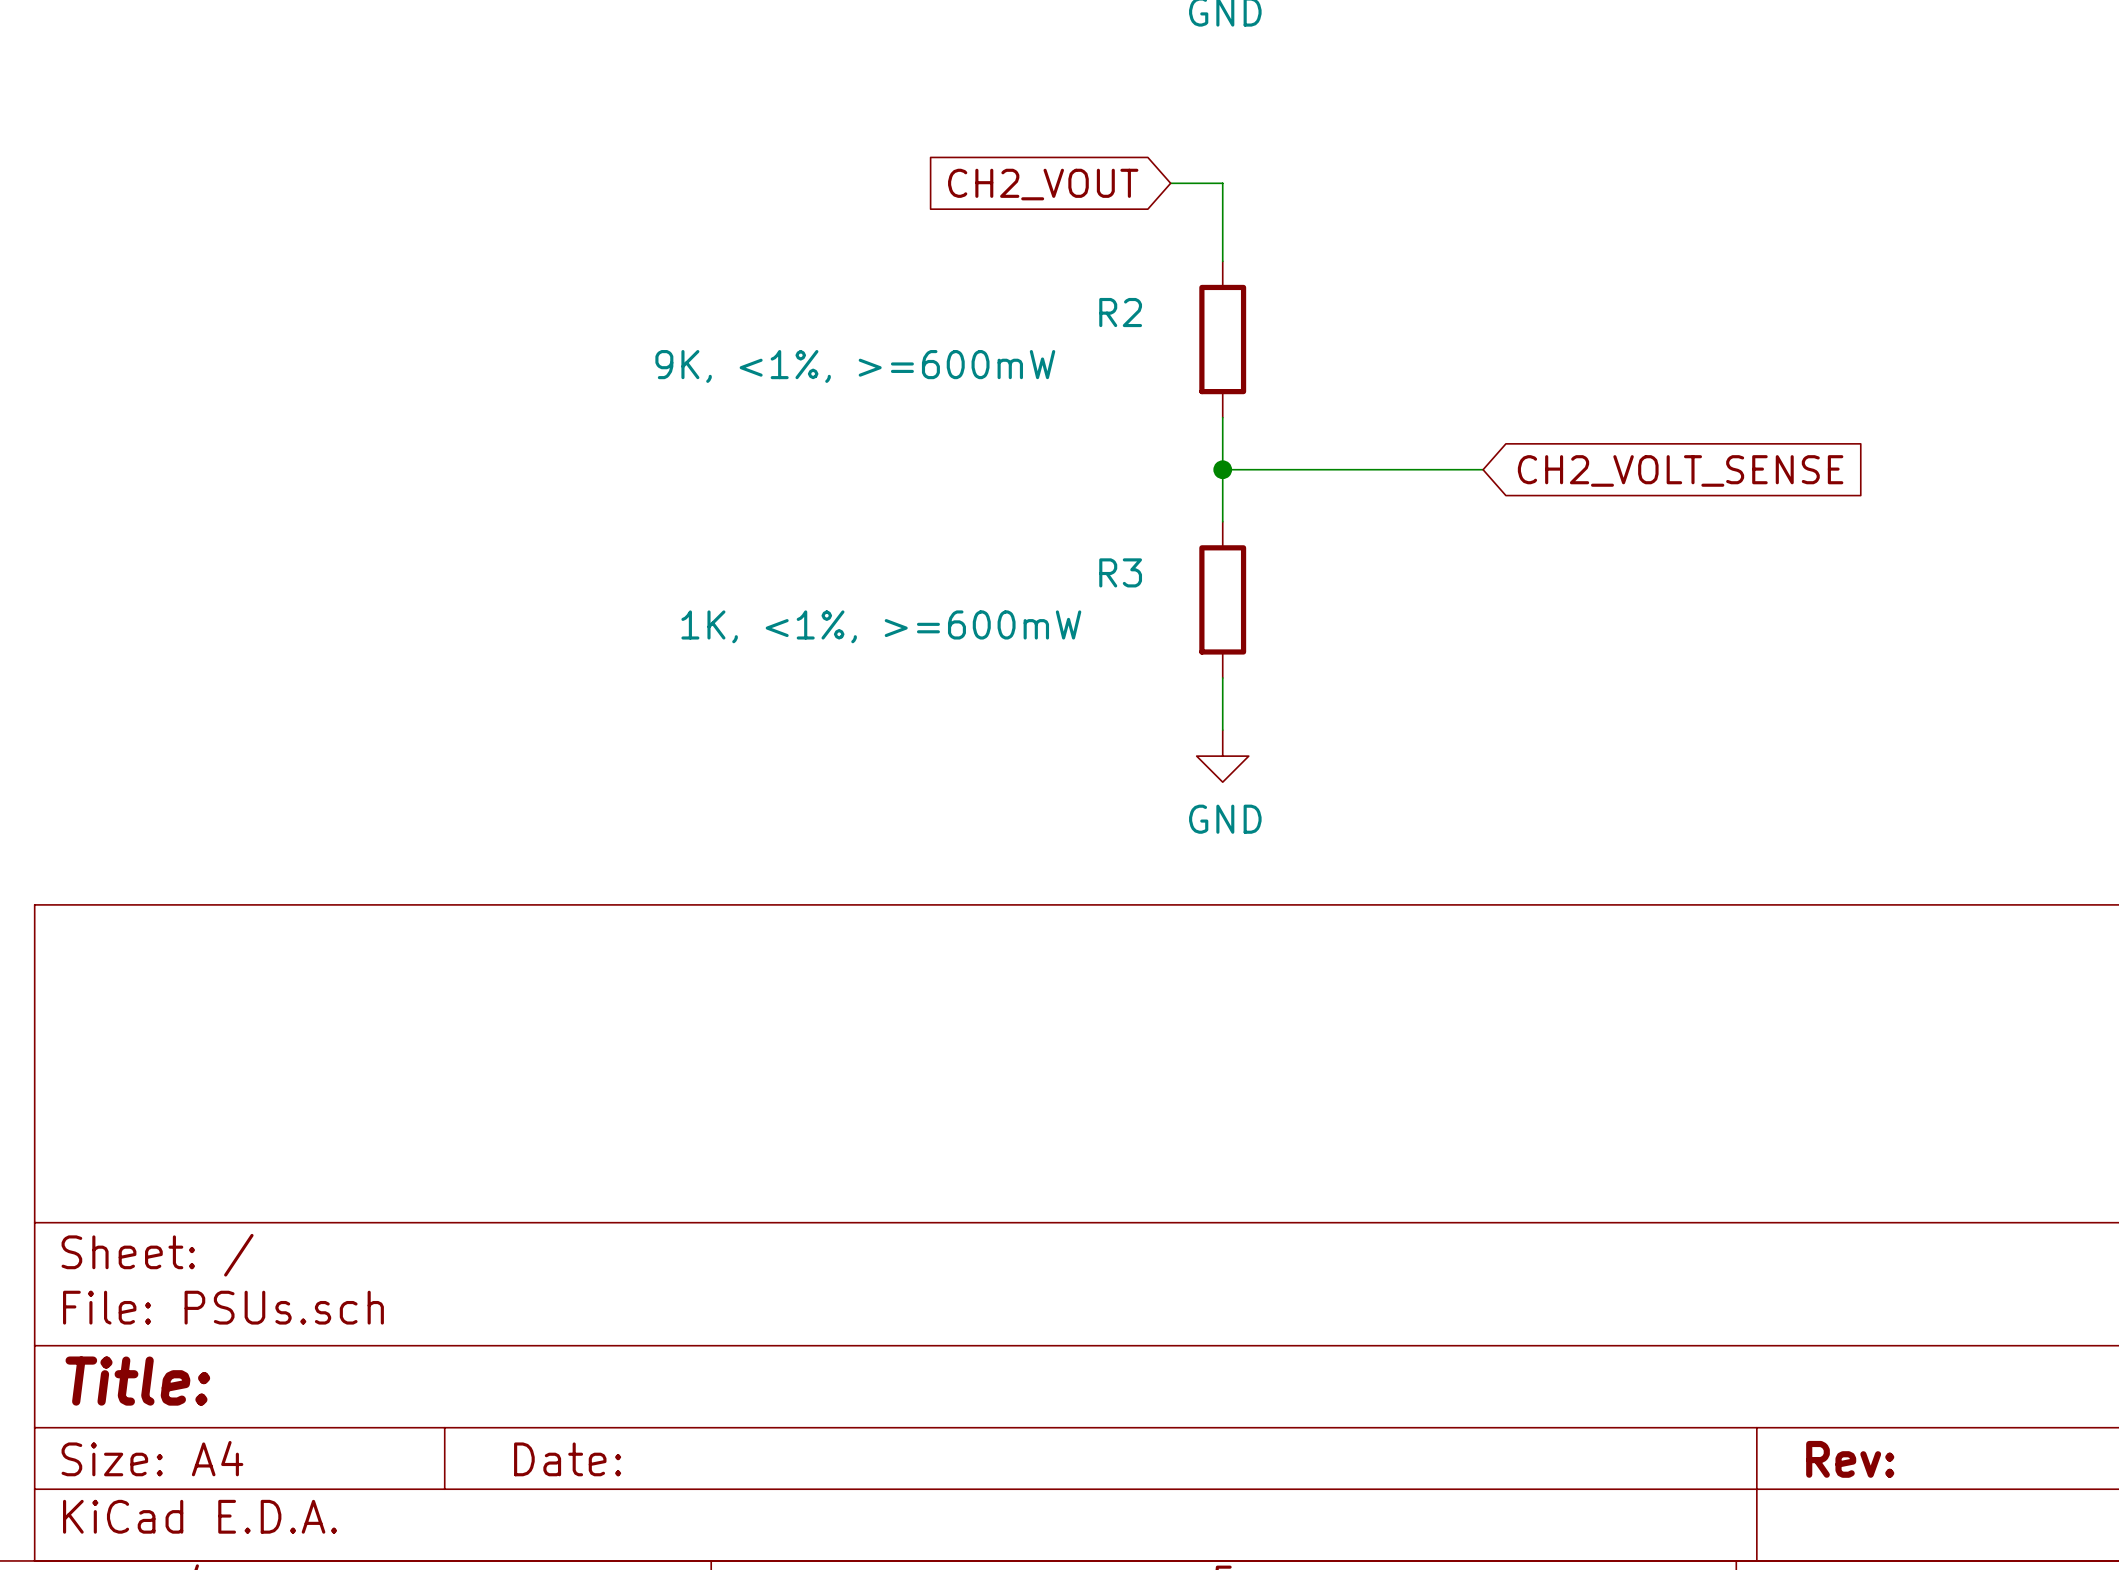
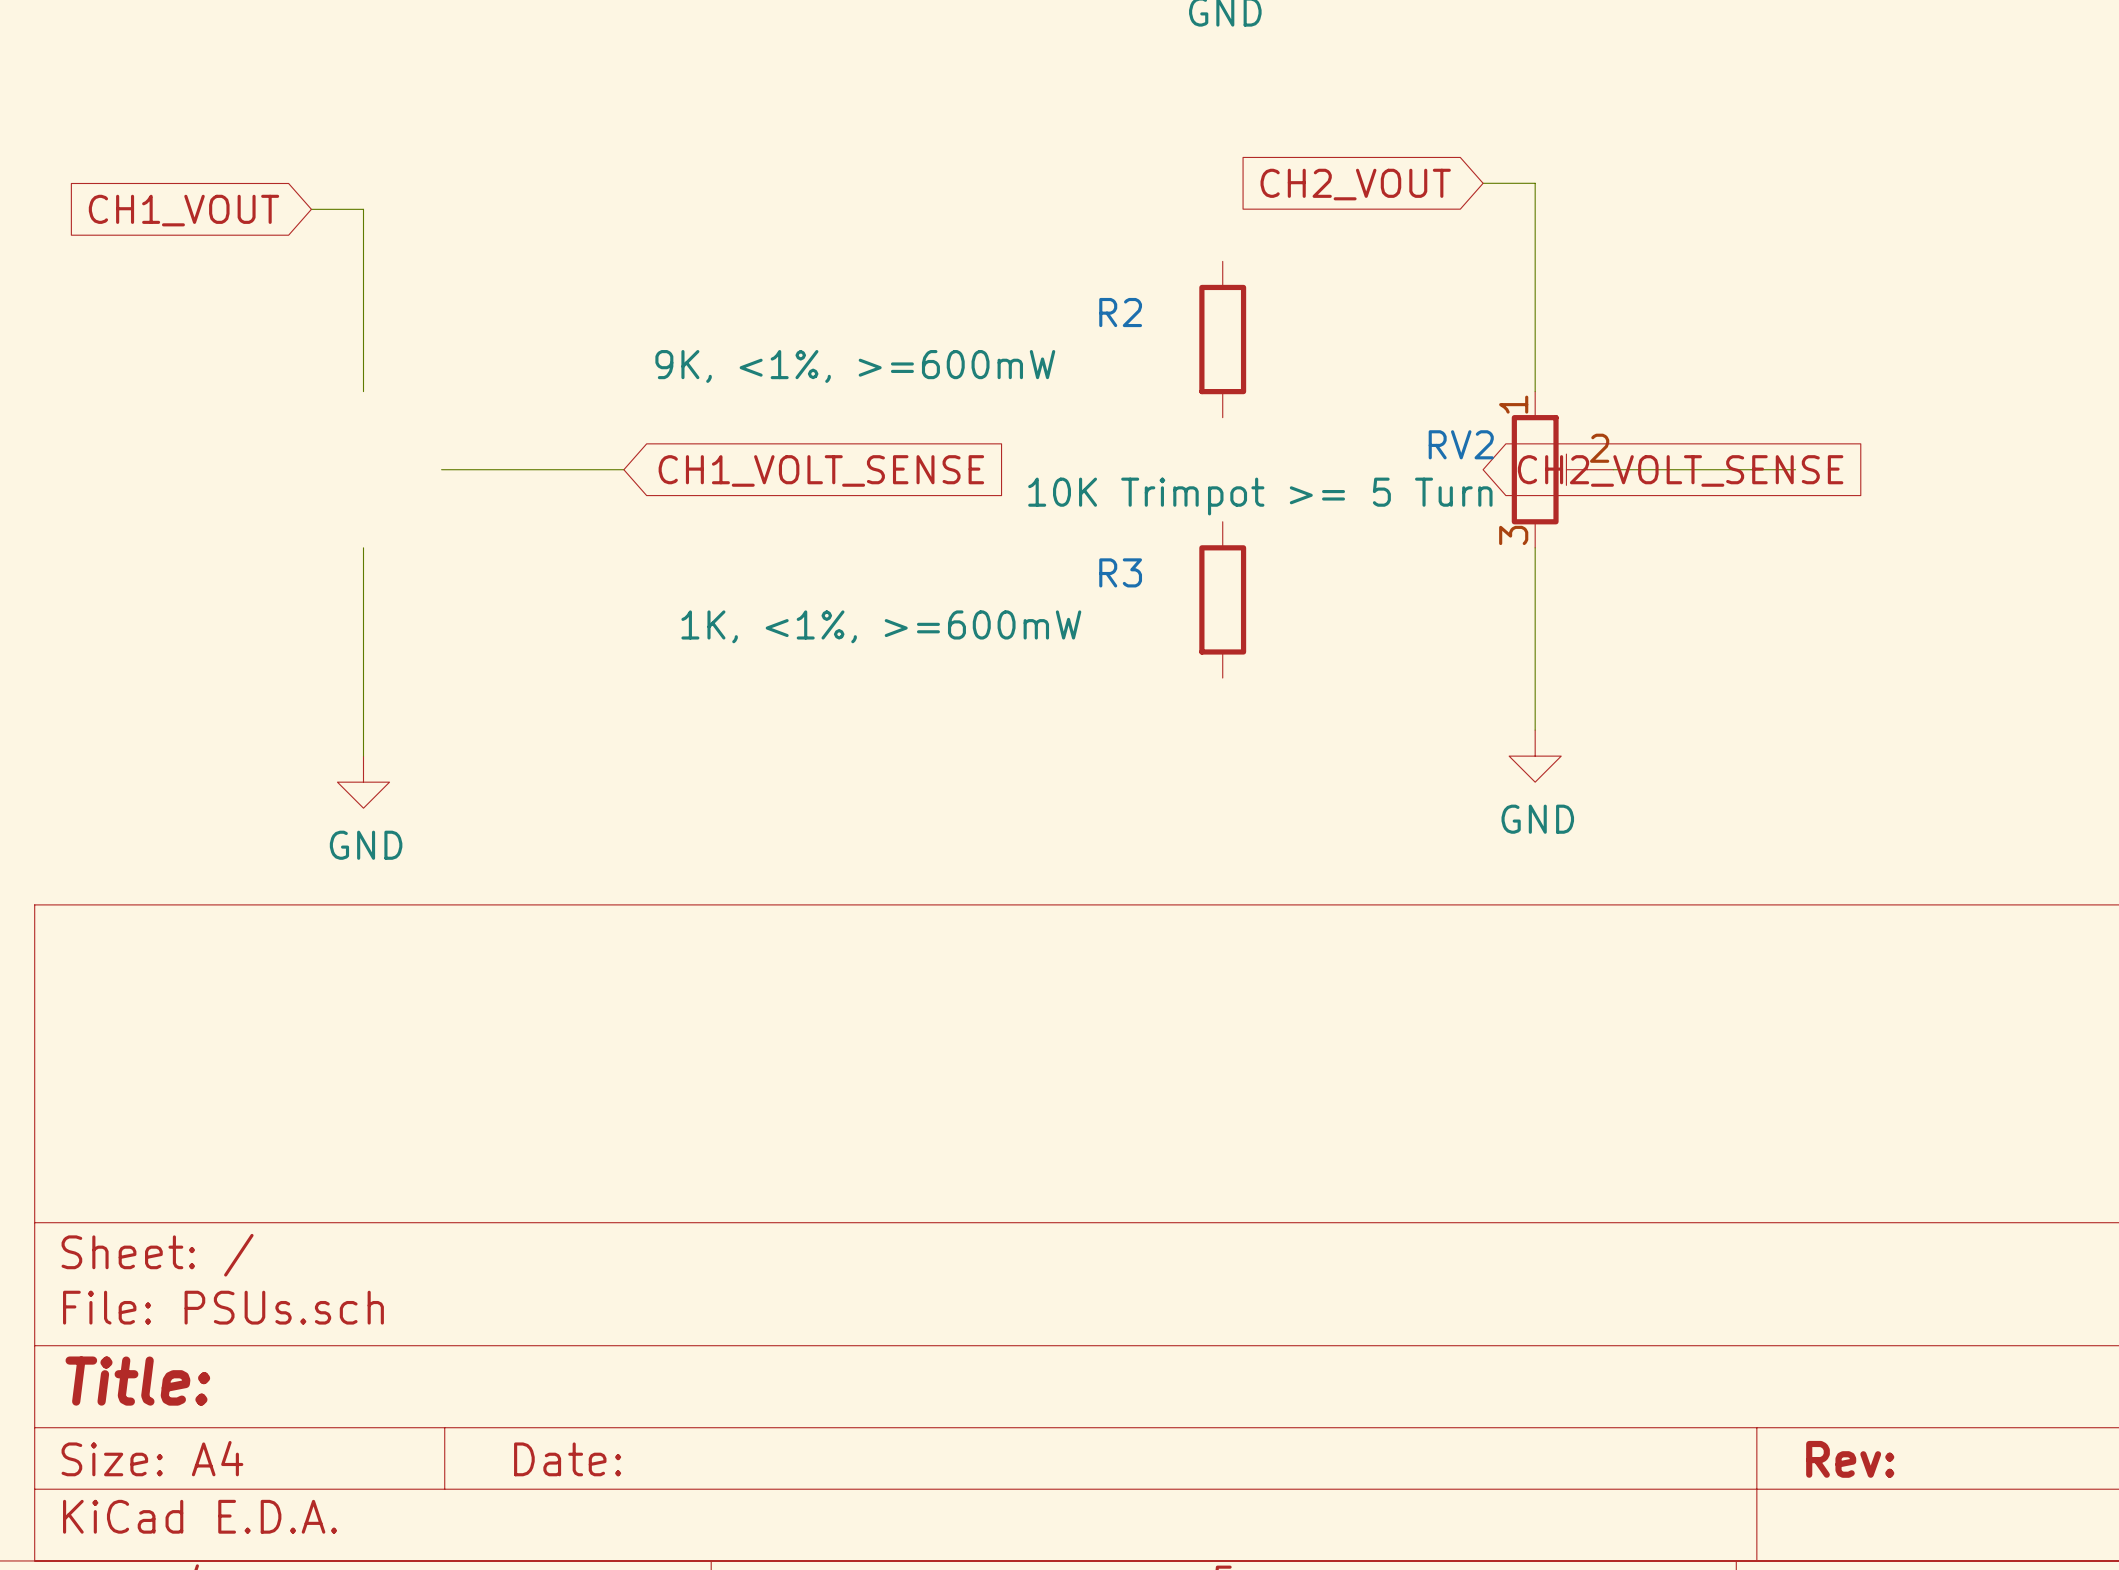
wire: (1170, 183) (1222, 183) (1222, 261) -> none
wire: none -> (1483, 183) (1535, 183) (1535, 391)
global label position: CH2_VOUT (1043, 184) -> CH2_VOUT (1355, 184)
wire: none -> (311, 209) (363, 209) (363, 391)
global label: none -> CH1_VOUT (183, 210)
wire: (1222, 417) (1222, 521) -> none
wire: none -> (441, 469) (623, 469)
wire: (1222, 469) (1483, 469) -> none
junction: (1222, 469) -> none
RV2: none -> 10K Trimpot >= 5 Turn (1562, 469)
wire: none -> (1613, 469) (1795, 469)
global label: none -> CH1_VOLT_SENSE (821, 470)
wire: none -> (363, 547) (363, 756)
wire: none -> (1535, 547) (1535, 730)
wire: (1222, 678) (1222, 730) -> none
power symbol position: GND (1222, 756) -> GND (1535, 756)
power symbol: none -> GND (363, 782)

